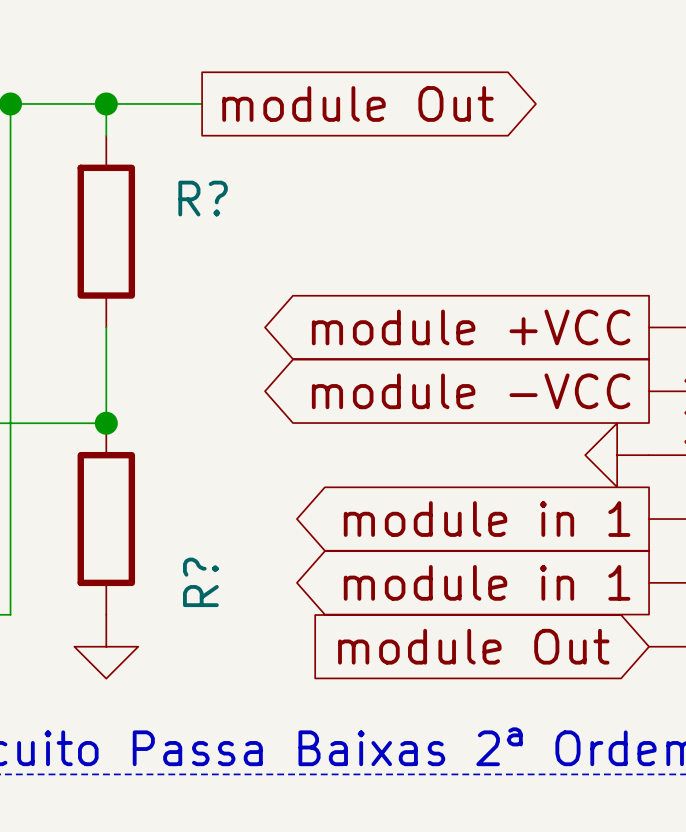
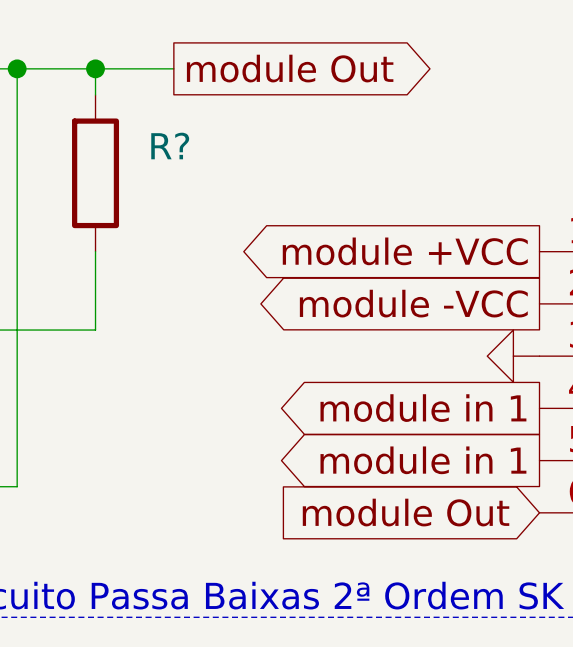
junction: (106, 423) -> none
R?: (106, 519) -> none
power symbol: (106, 646) -> none

